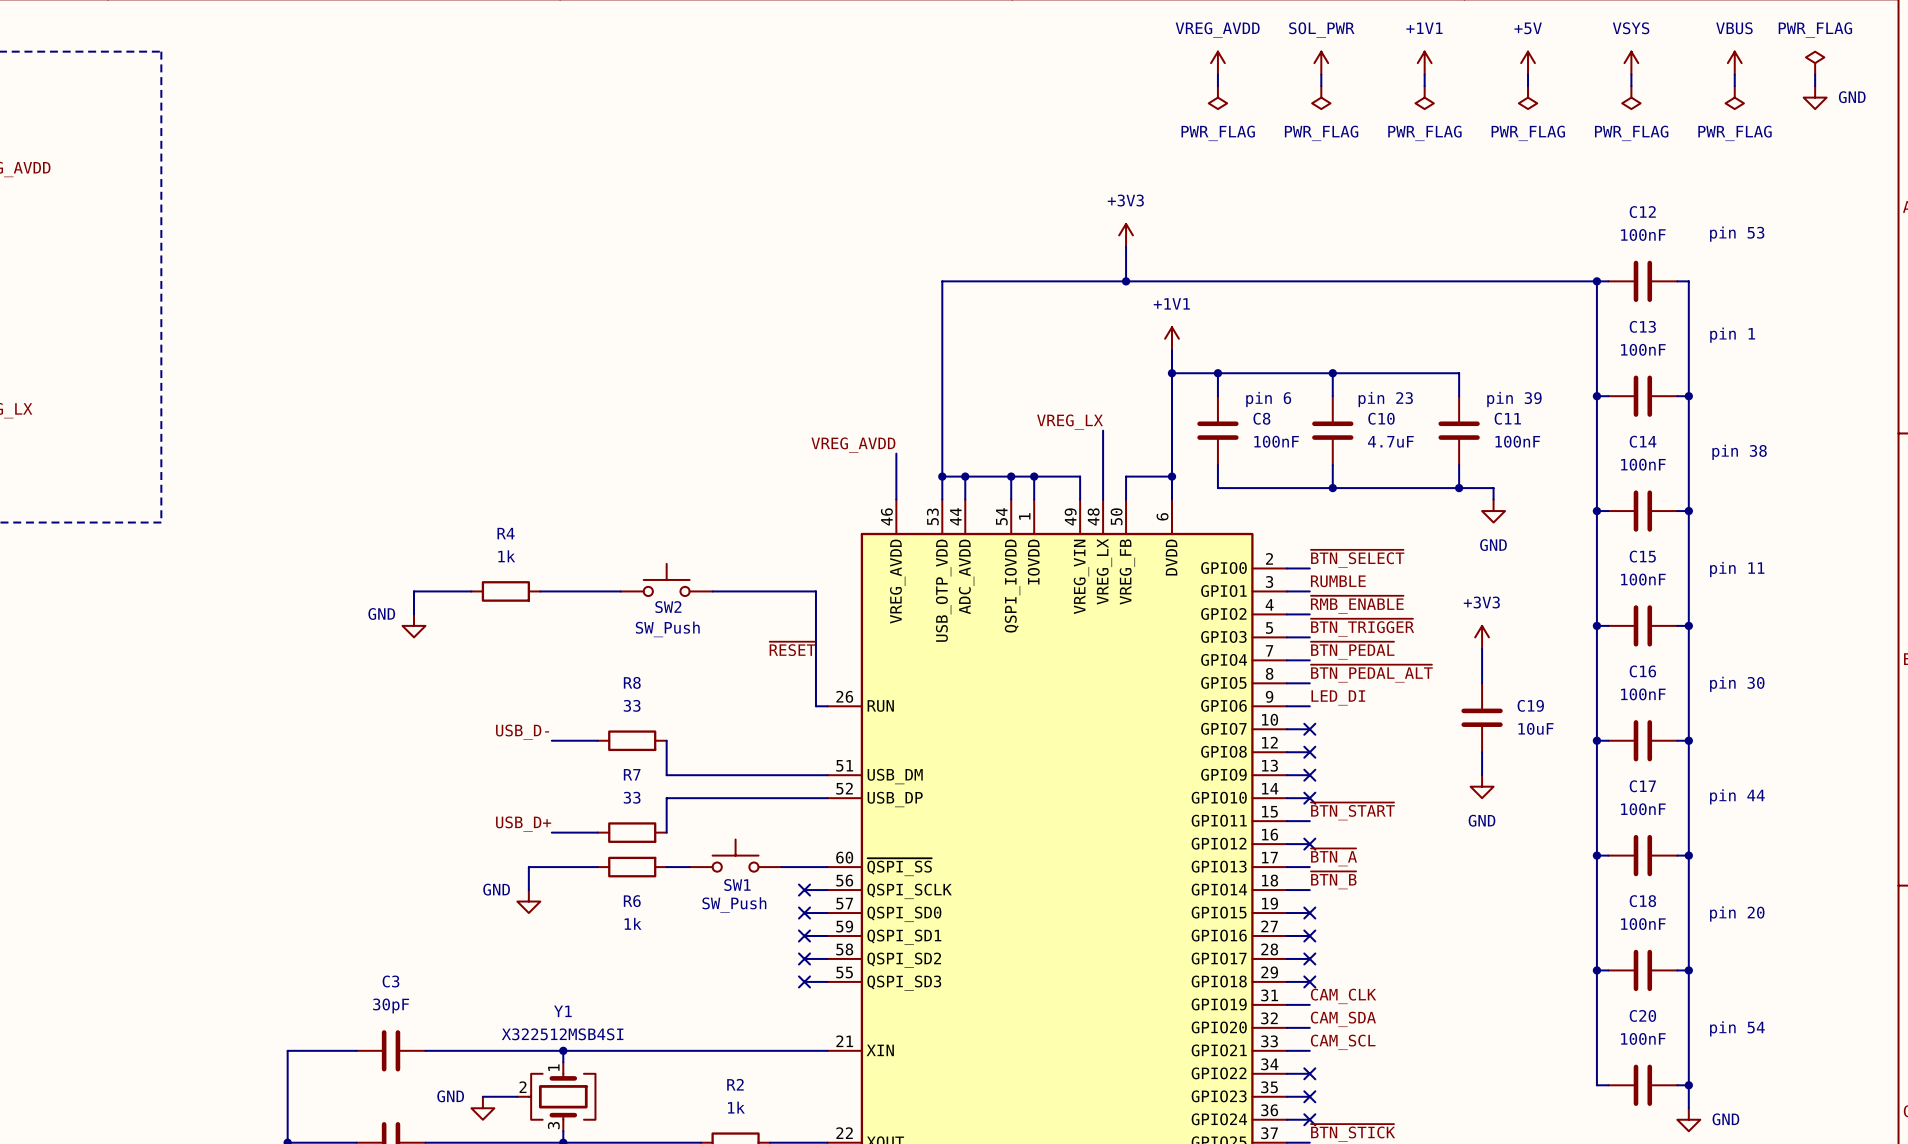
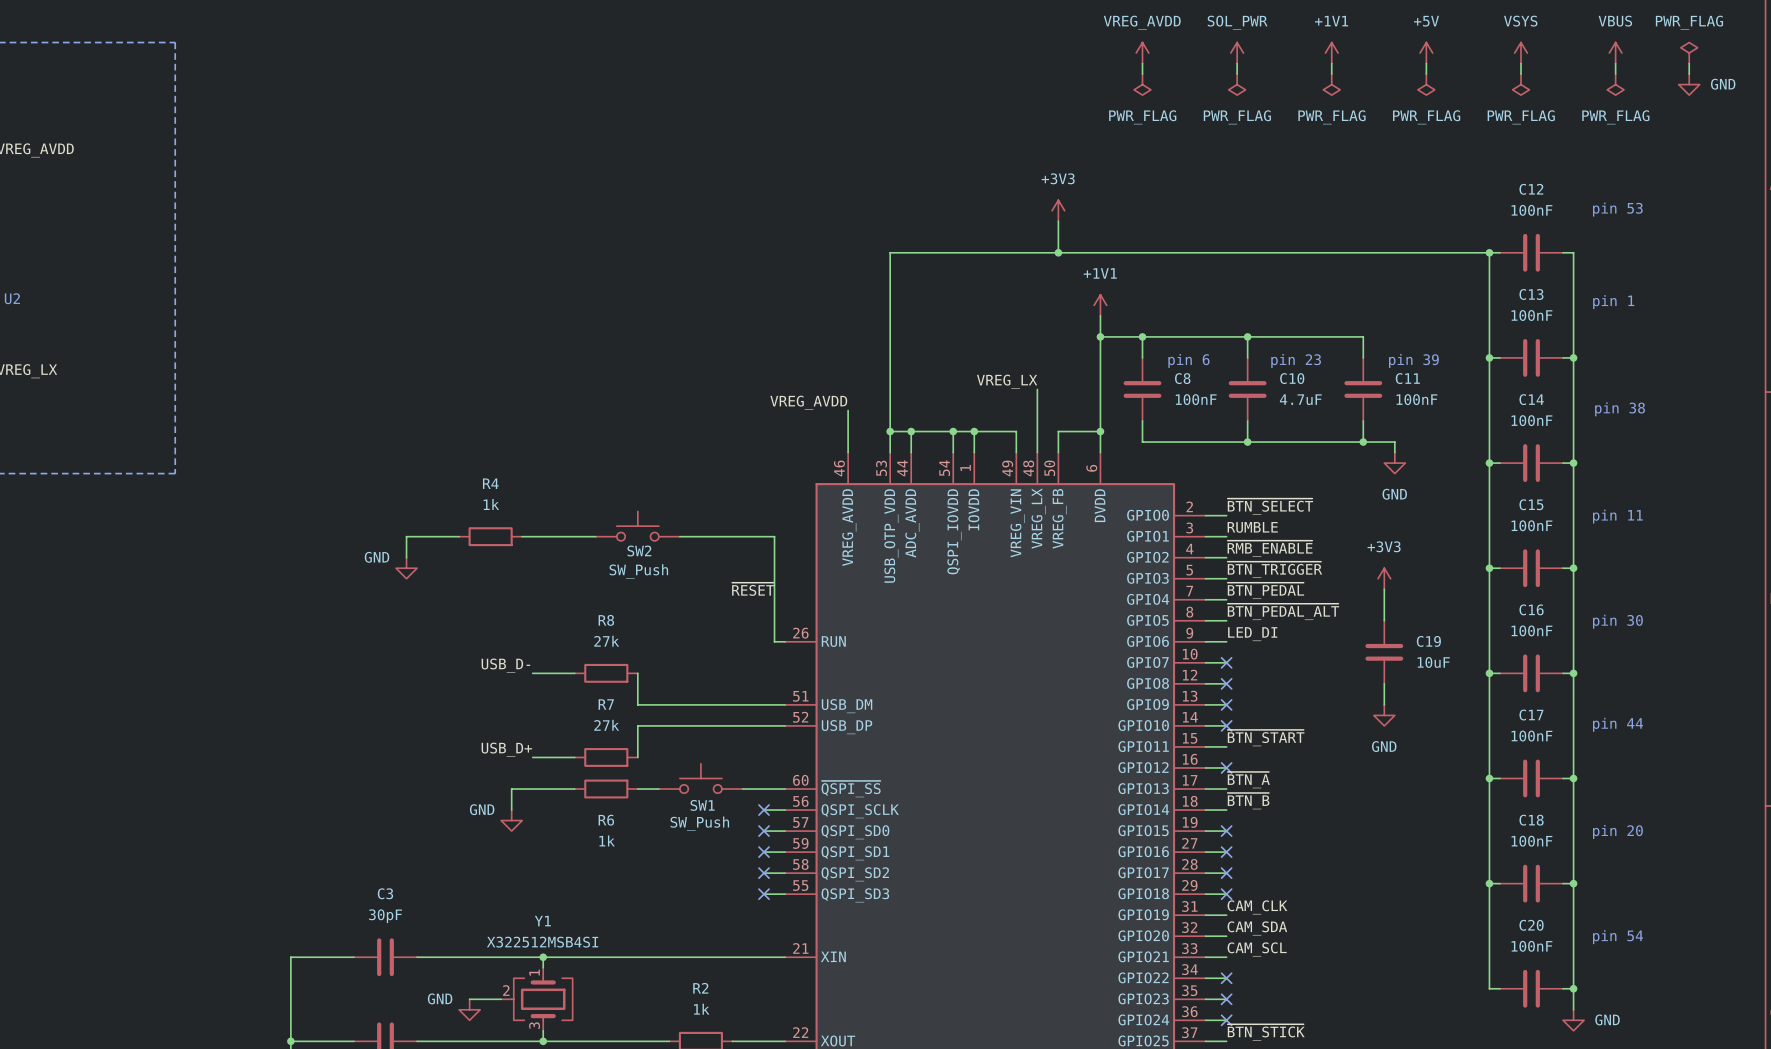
R8 value: 33 (632, 705) -> 27k (606, 641)
R7 value: 33 (632, 797) -> 27k (606, 725)

